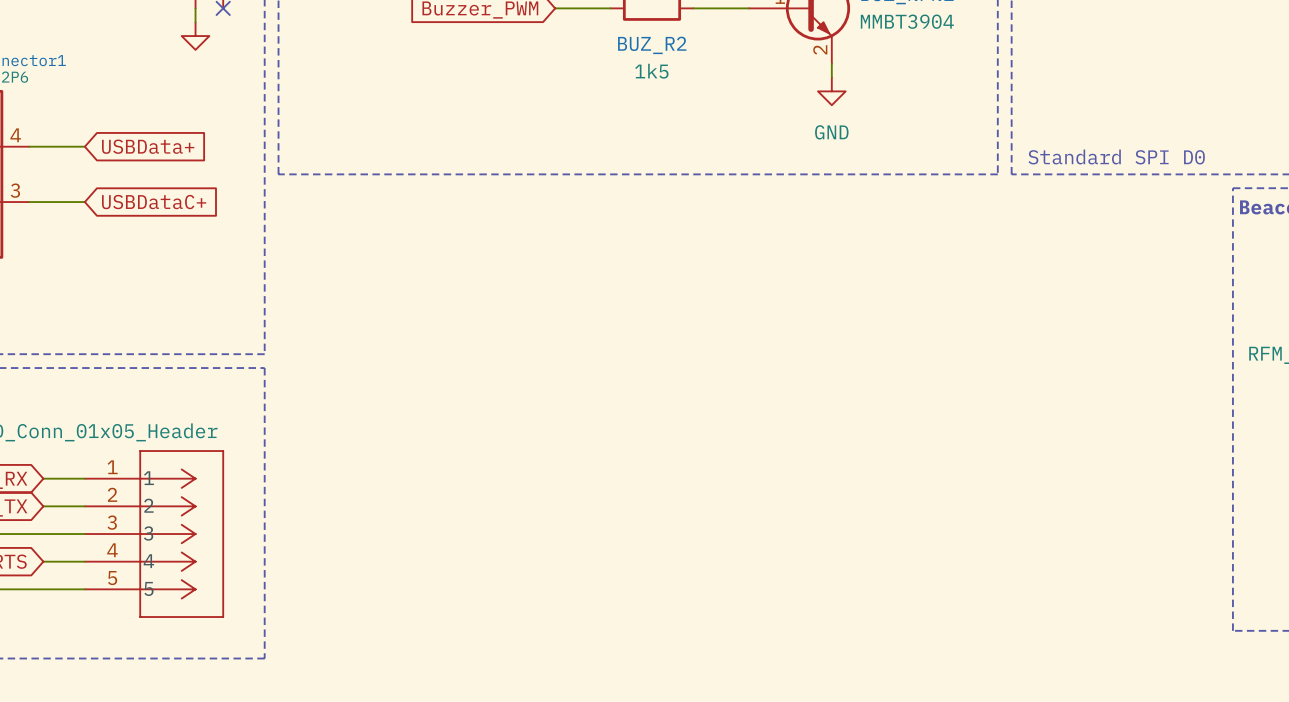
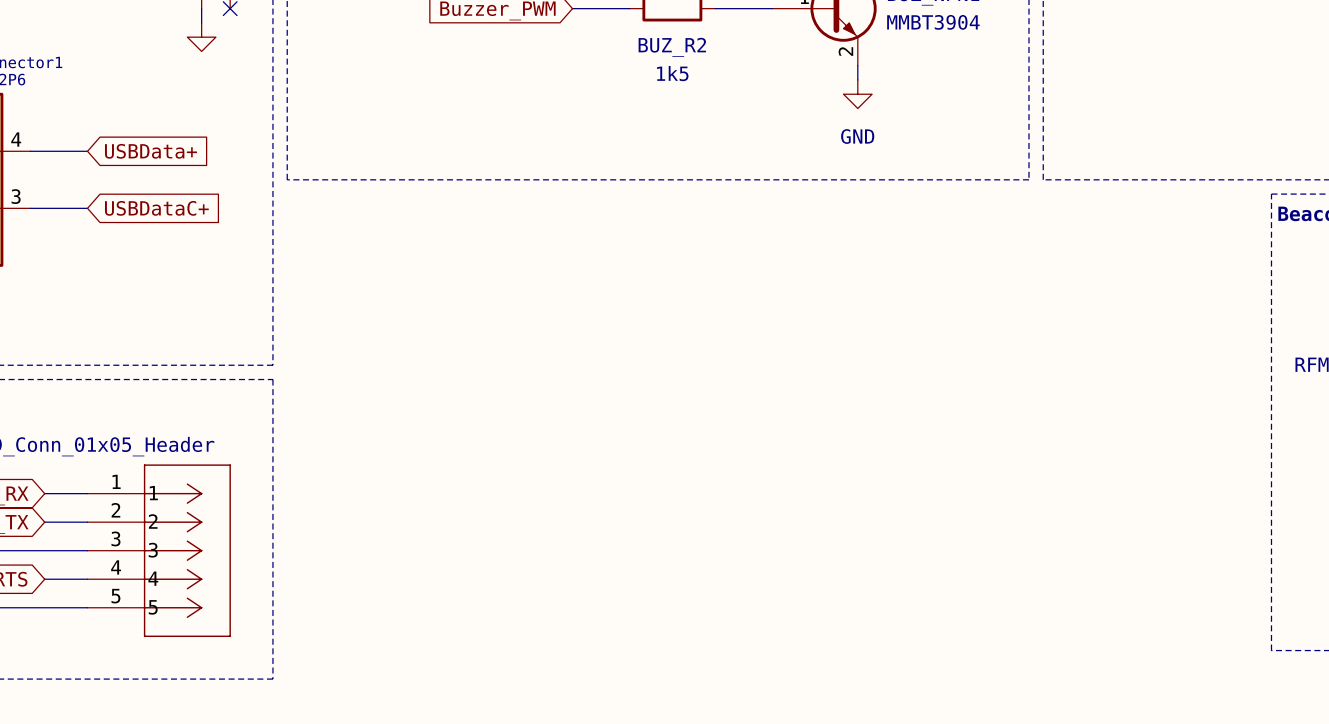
text: Standard SPI D0 (1116, 157) -> none

